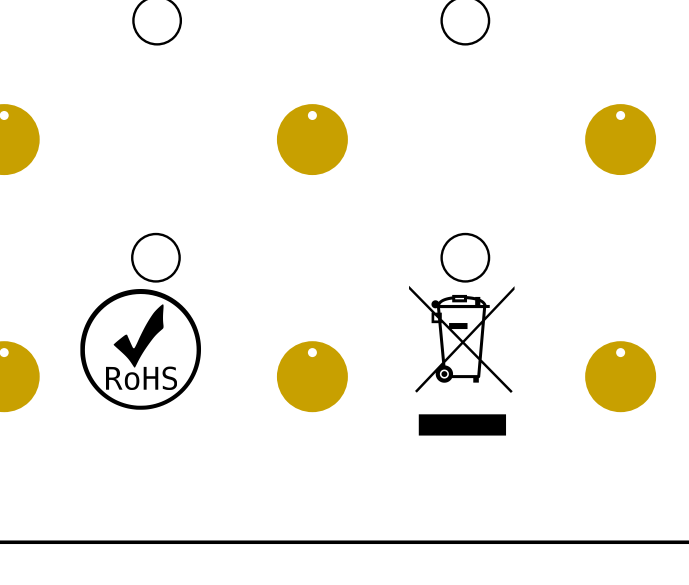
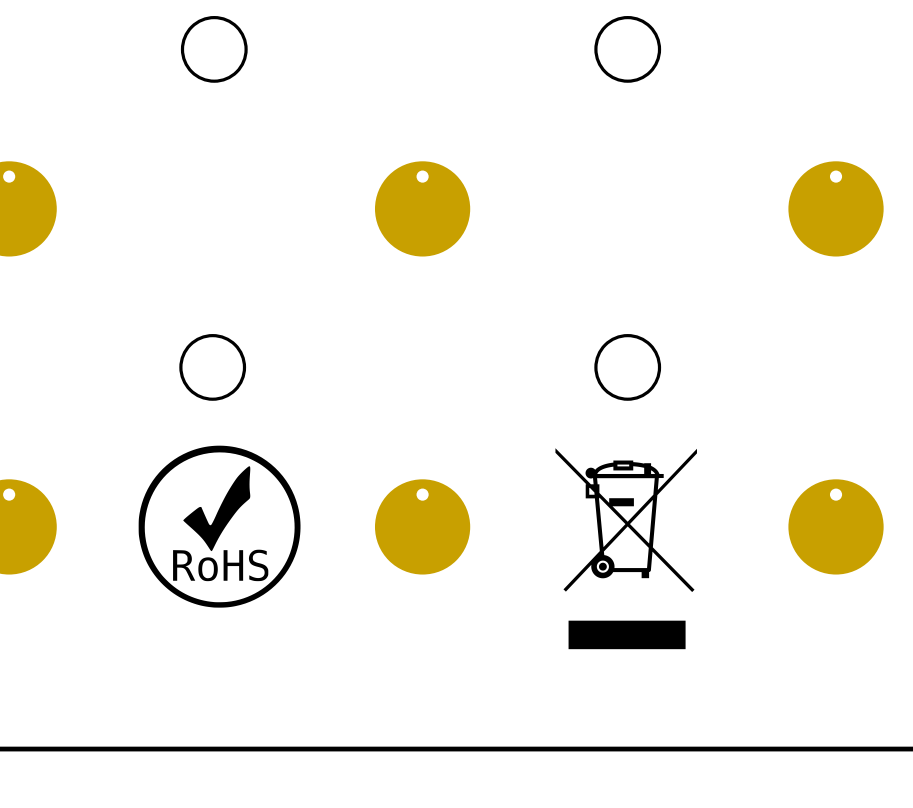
drawing position: (138, 335) -> (216, 508)
drawing position: (461, 339) -> (626, 520)
drawing position: (140, 349) -> (219, 526)
drawing position: (444, 374) -> (602, 566)
drawing position: (114, 378) -> (184, 565)
drawing position: (150, 378) -> (233, 565)
drawing position: (169, 378) -> (258, 565)
drawing position: (132, 381) -> (208, 569)
drawing position: (462, 424) -> (627, 634)

